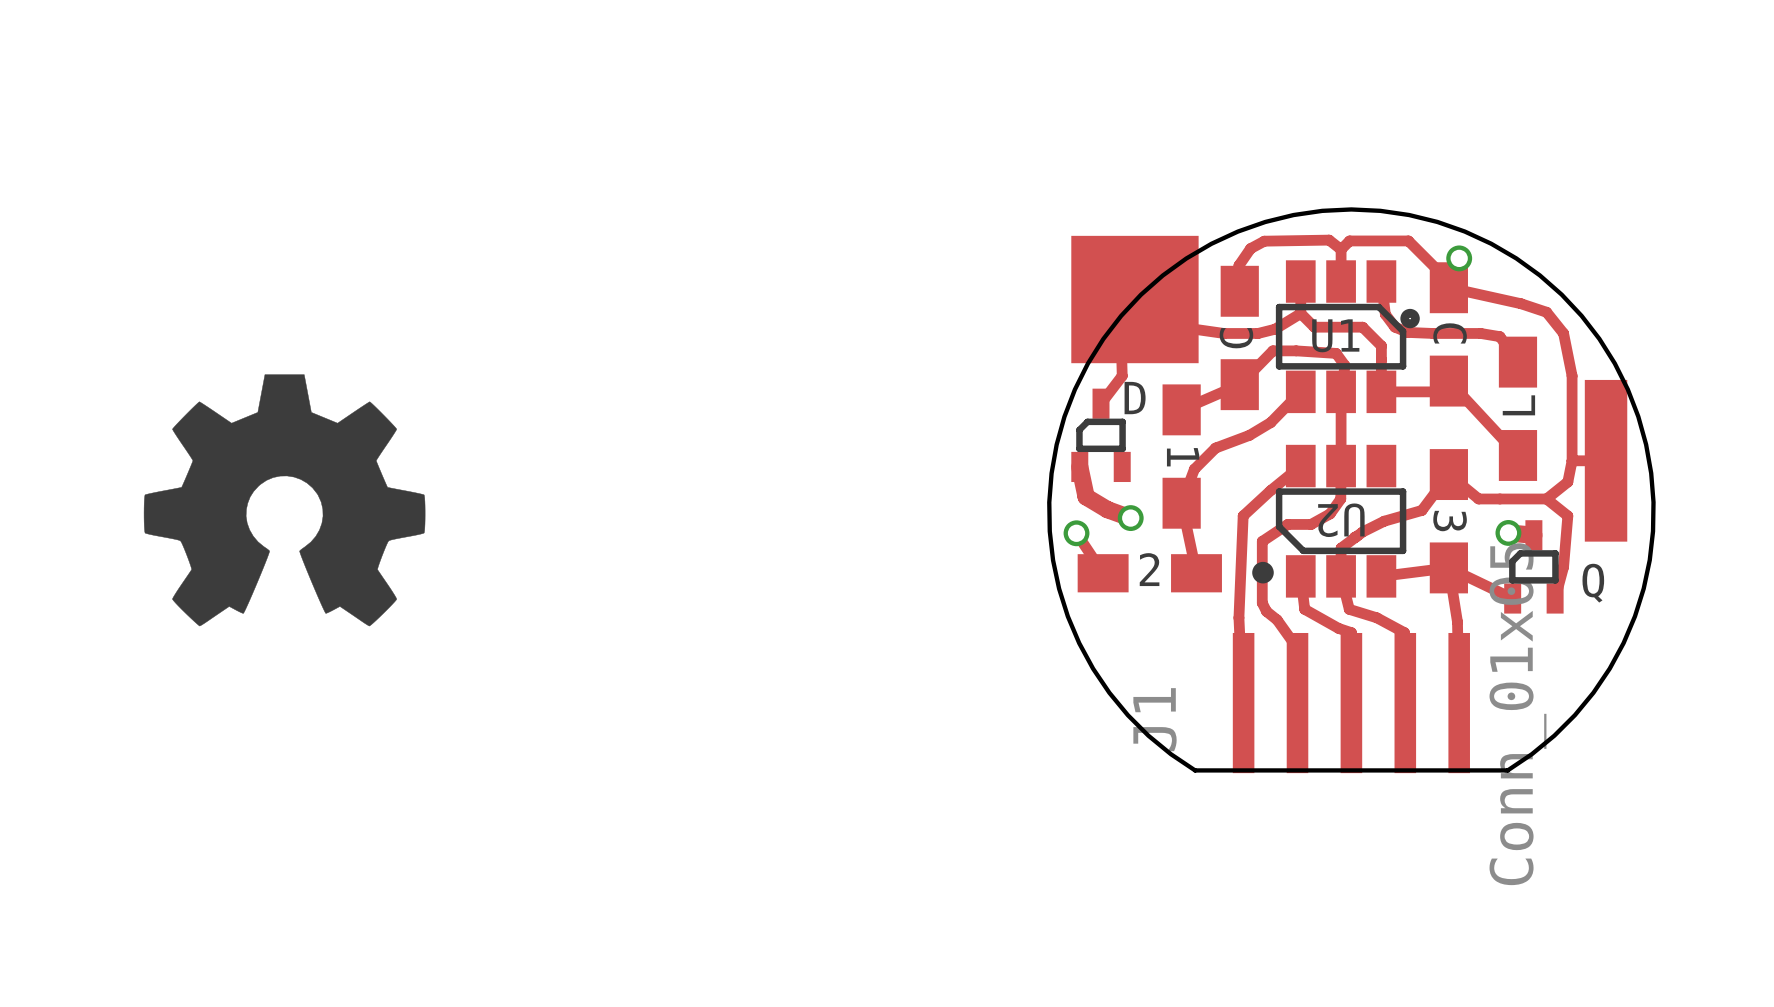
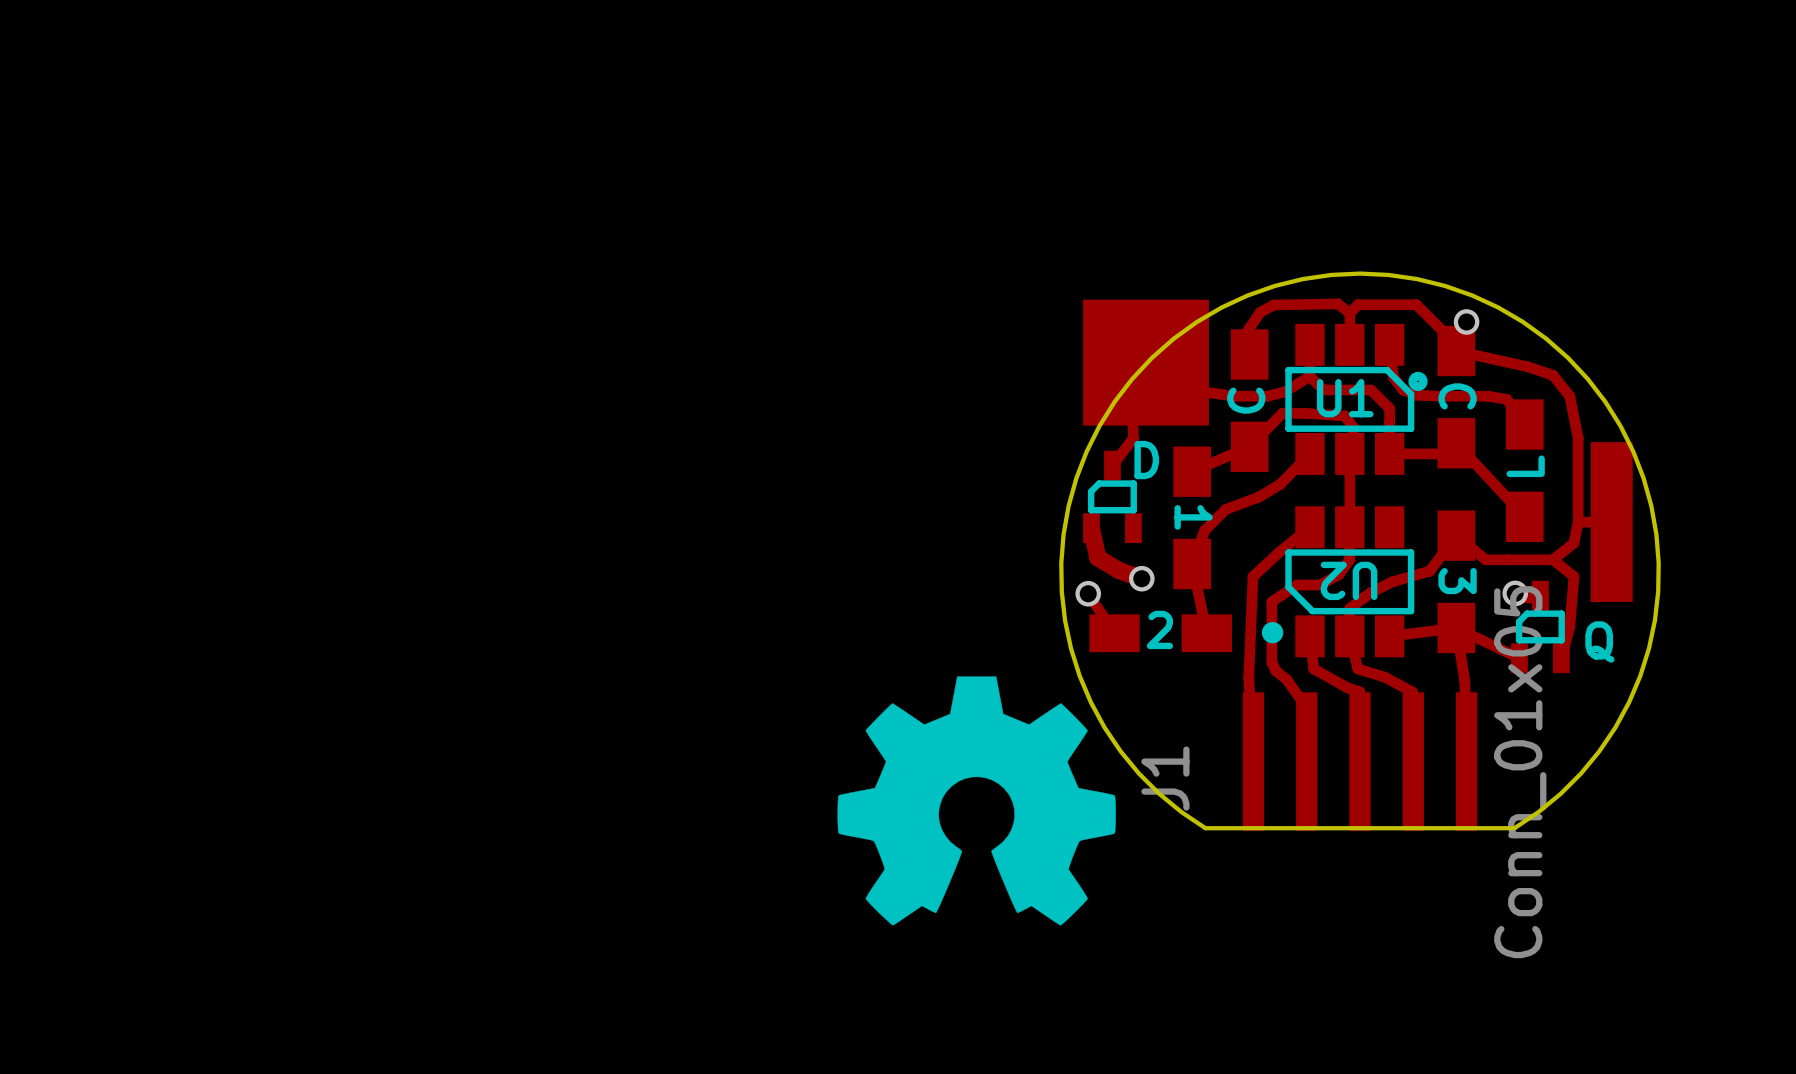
drawing position: (284, 500) -> (976, 800)

